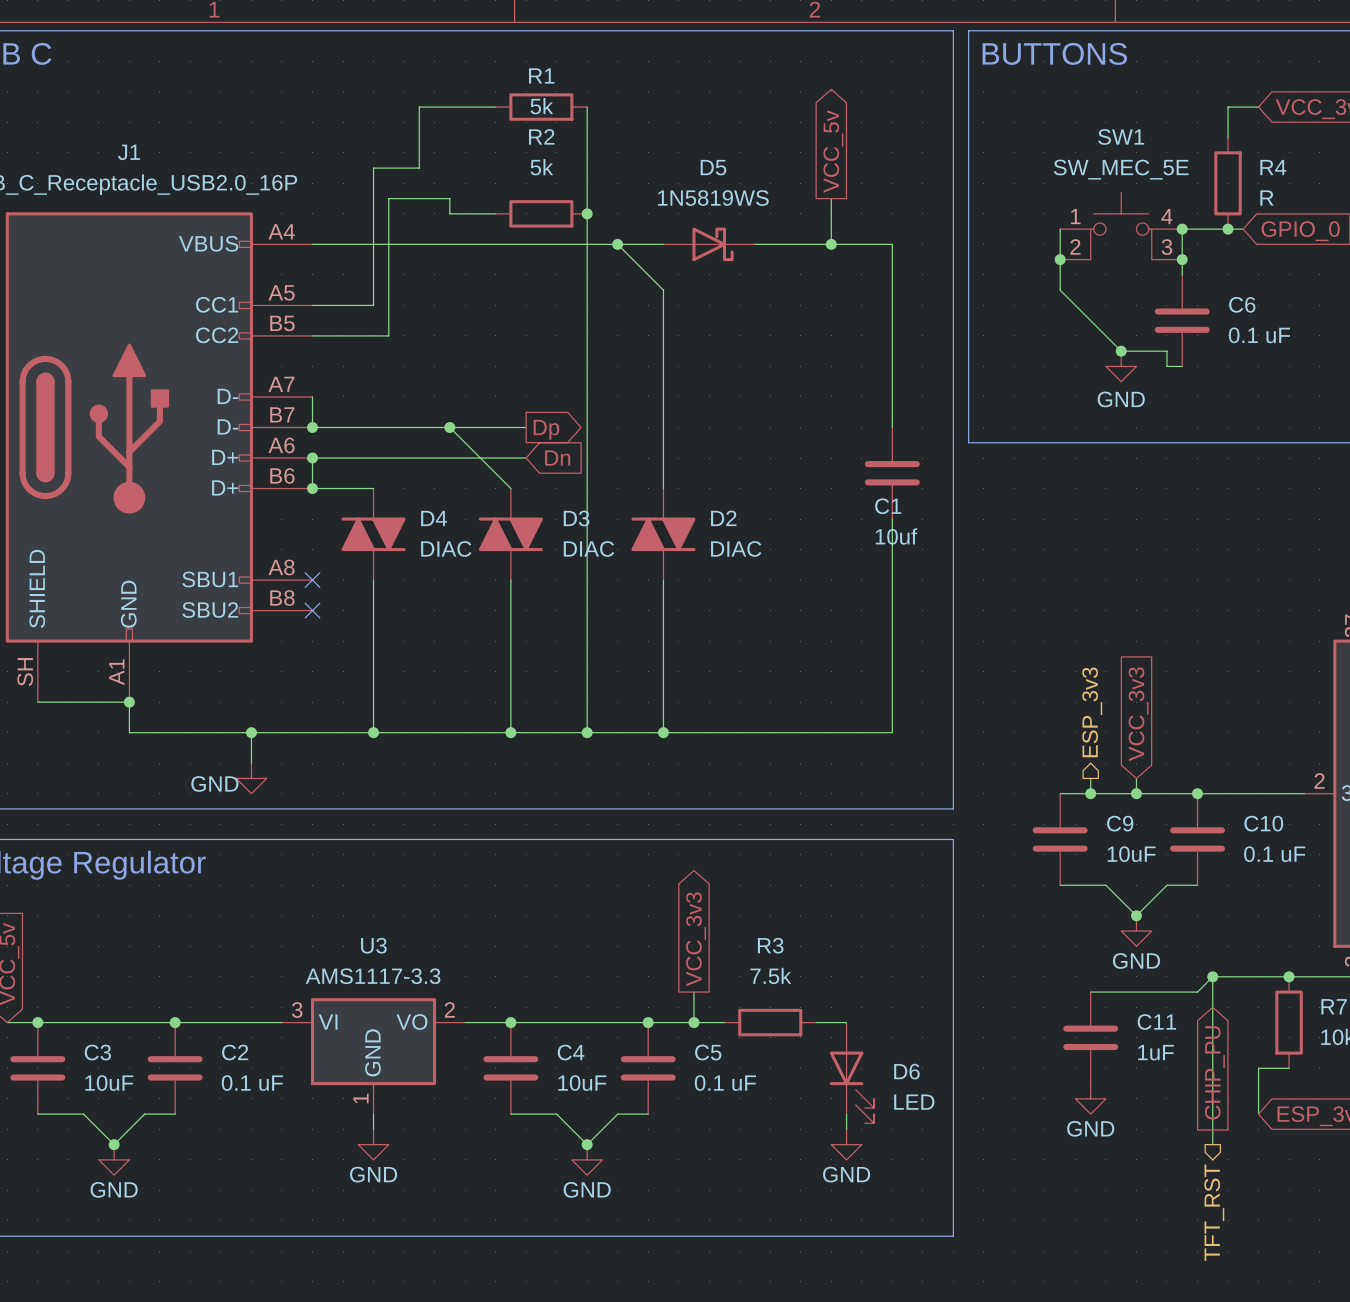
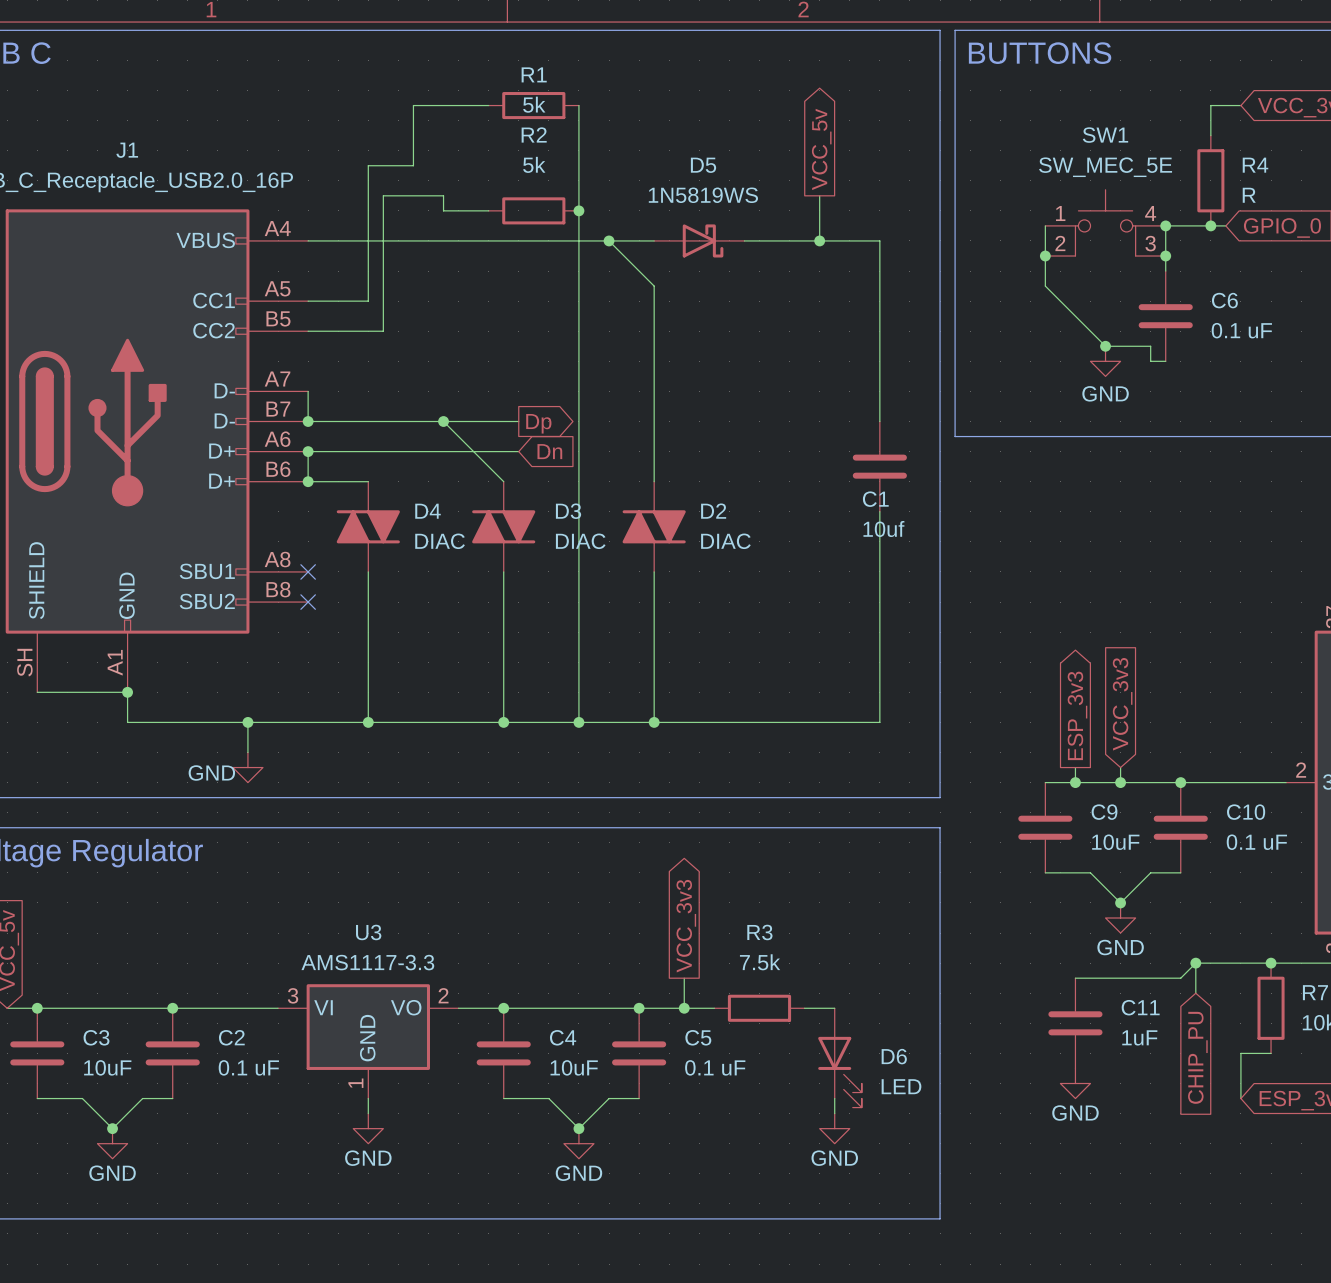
hierarchical label: ESP_3v3 (1092, 712) -> none
global label: none -> ESP_3v3 (1077, 715)
wire: (1212, 1007) (1212, 1144) -> none
hierarchical label: TFT_RST (1214, 1212) -> none

